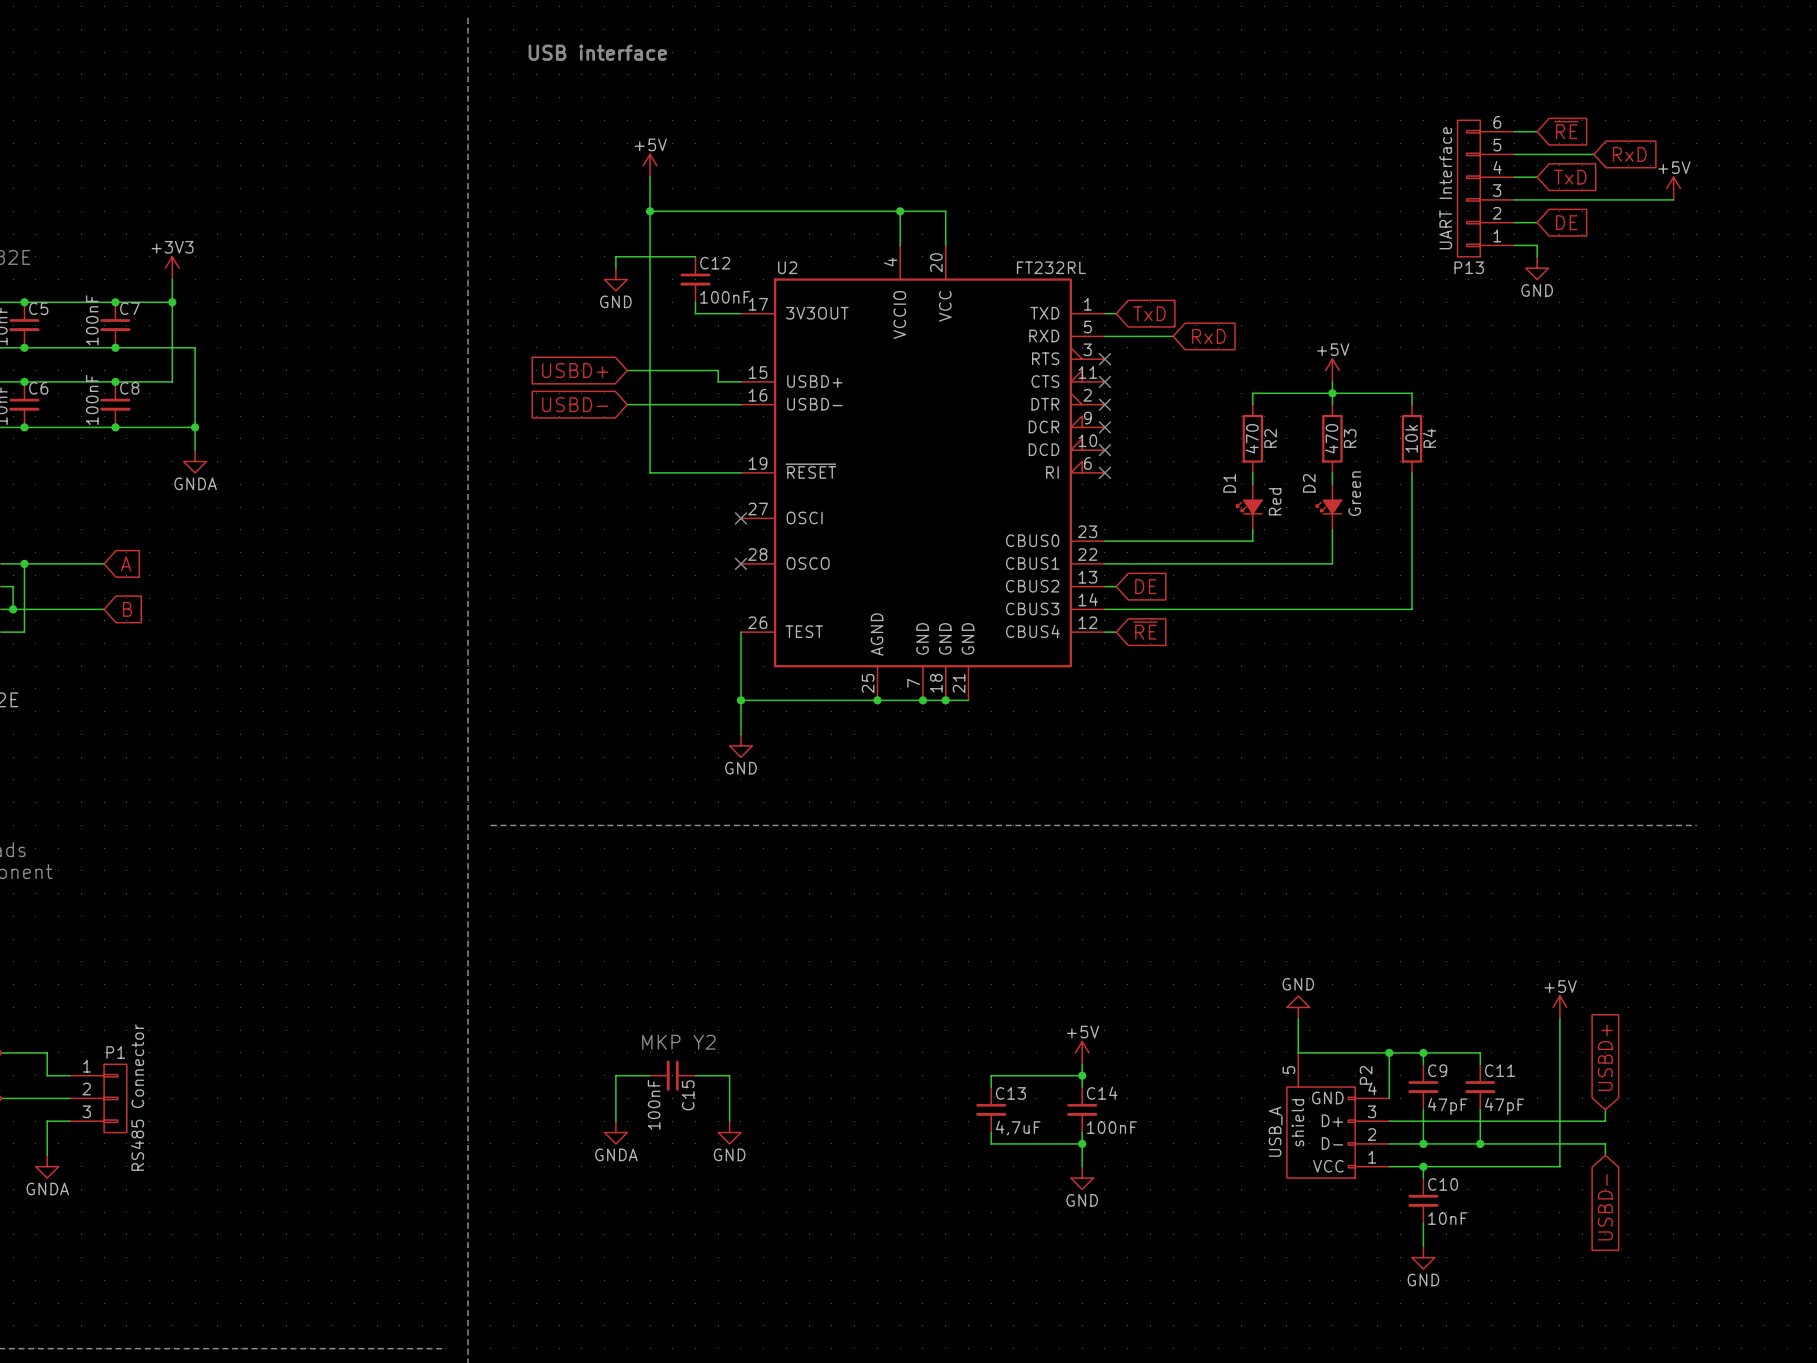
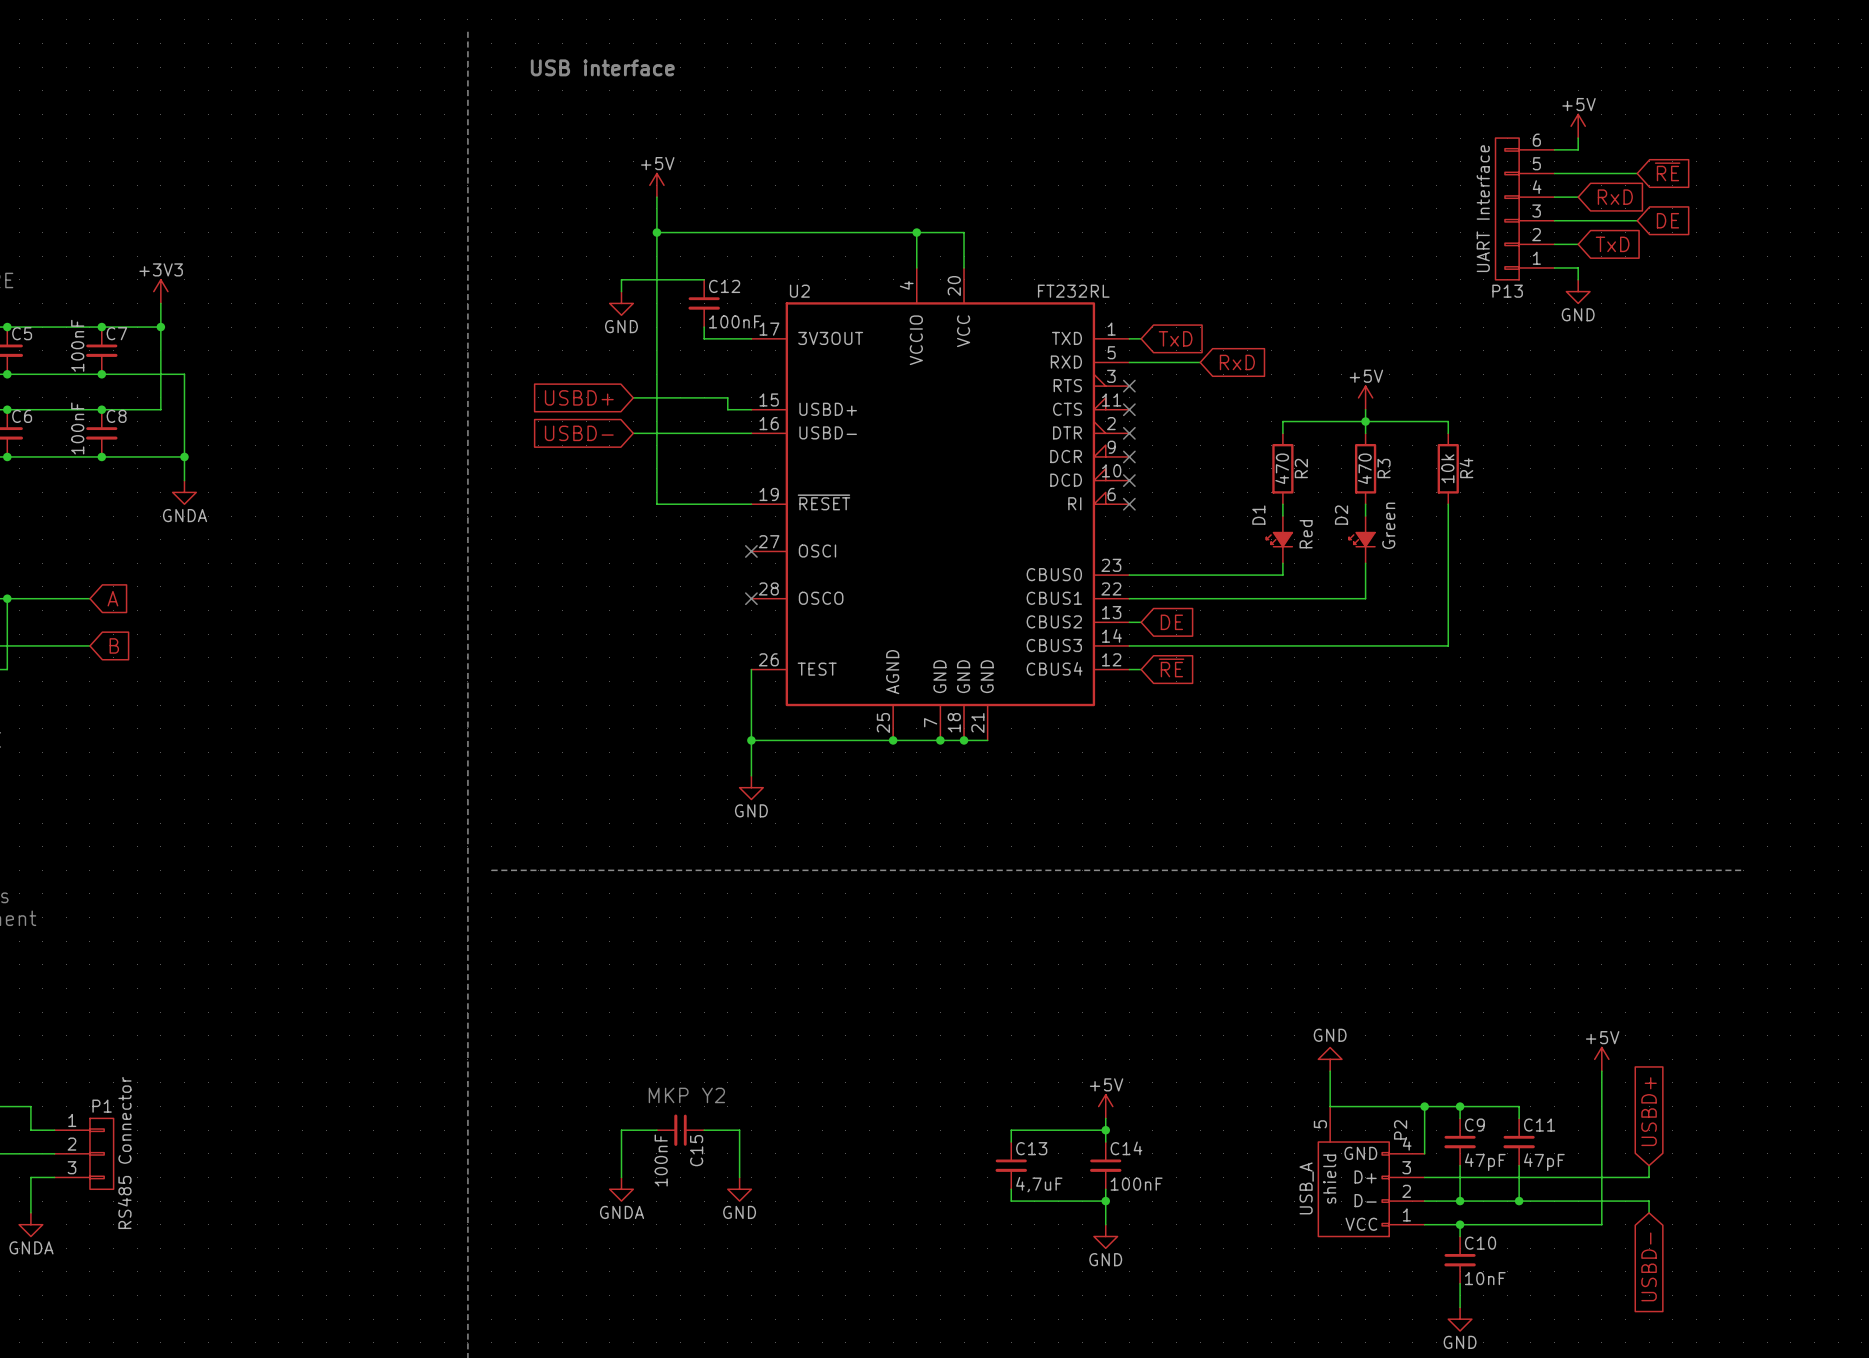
wire: none -> (1578, 138) (1578, 149)
global label: ~{RE} (1566, 130) -> none
global label: RxD (1629, 154) -> ~{RE} (1667, 171)
global label: TxD (1570, 177) -> RxD (1615, 197)
power symbol position: +5V (1673, 188) -> +5V (1578, 126)
wire: (1594, 199) (1673, 199) -> none
global label: none -> DE (1667, 220)
global label: DE (1566, 222) -> TxD (1612, 244)

